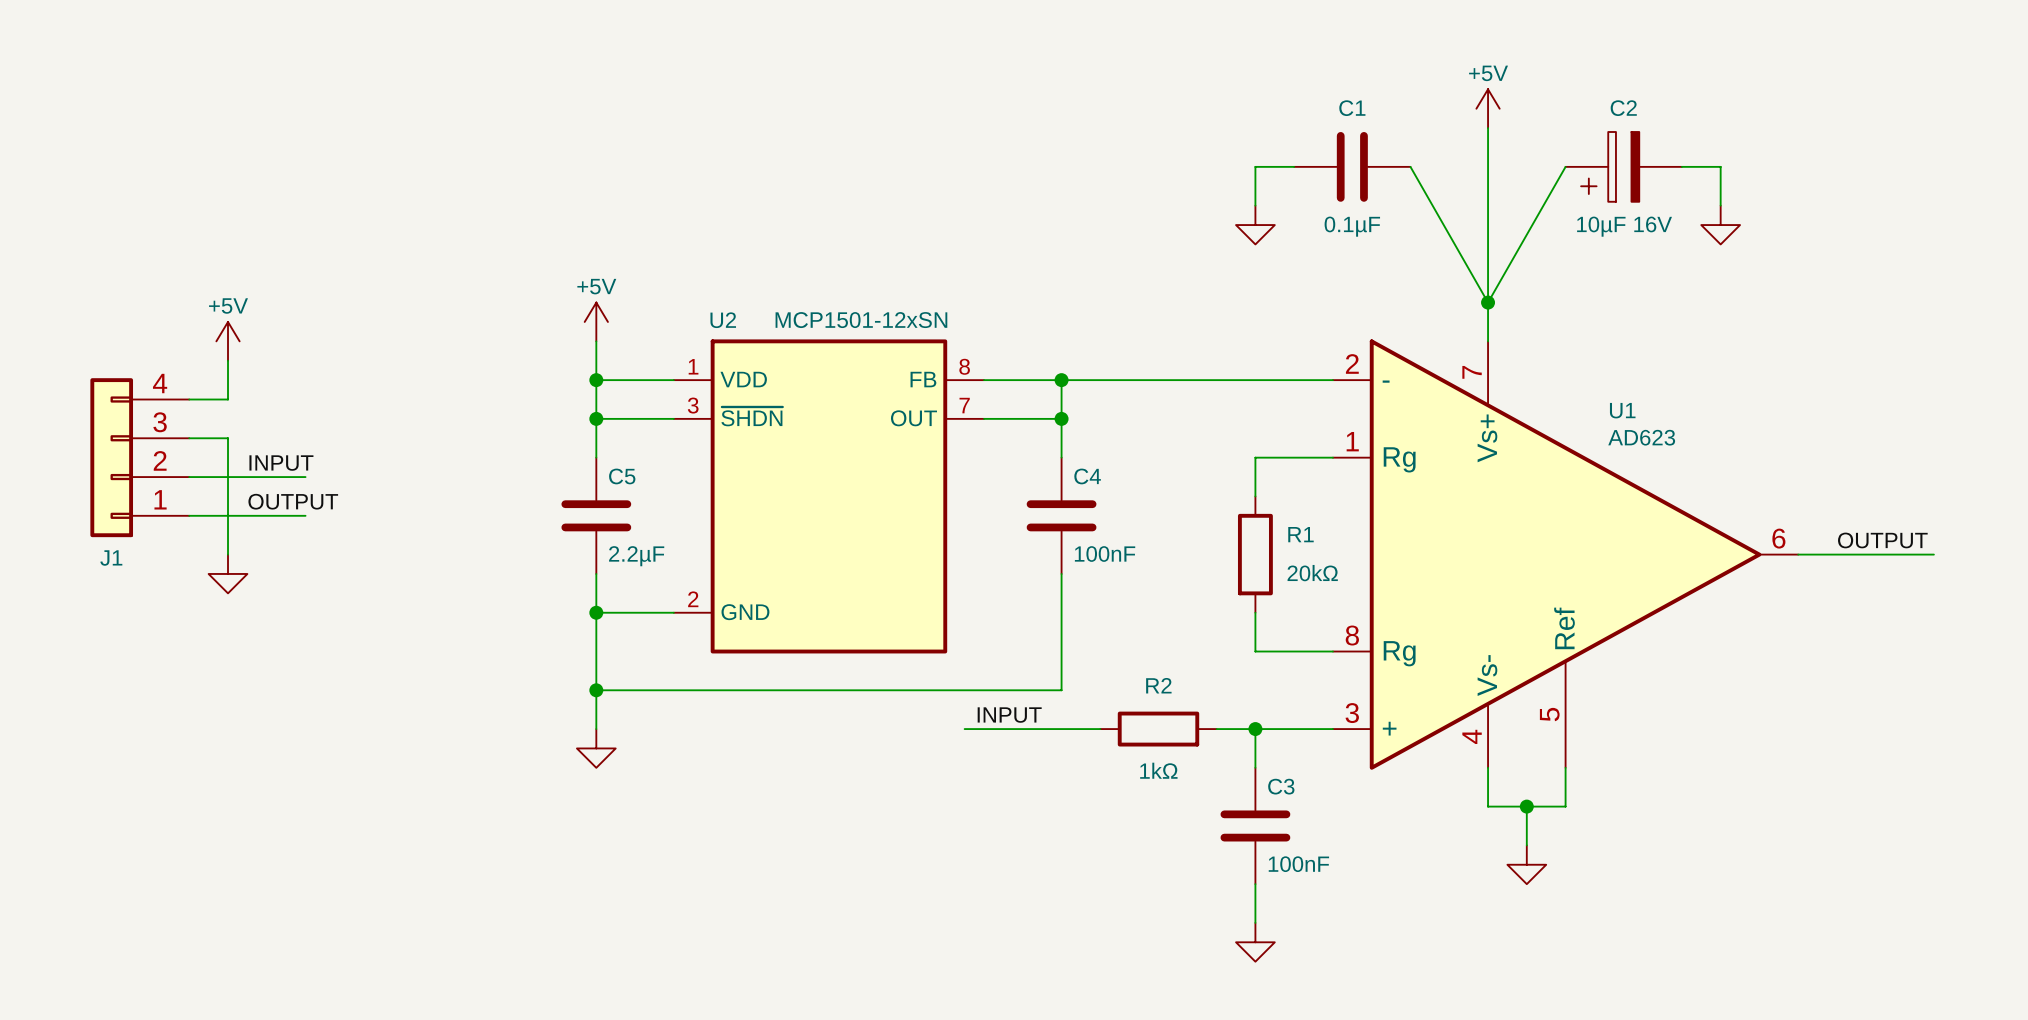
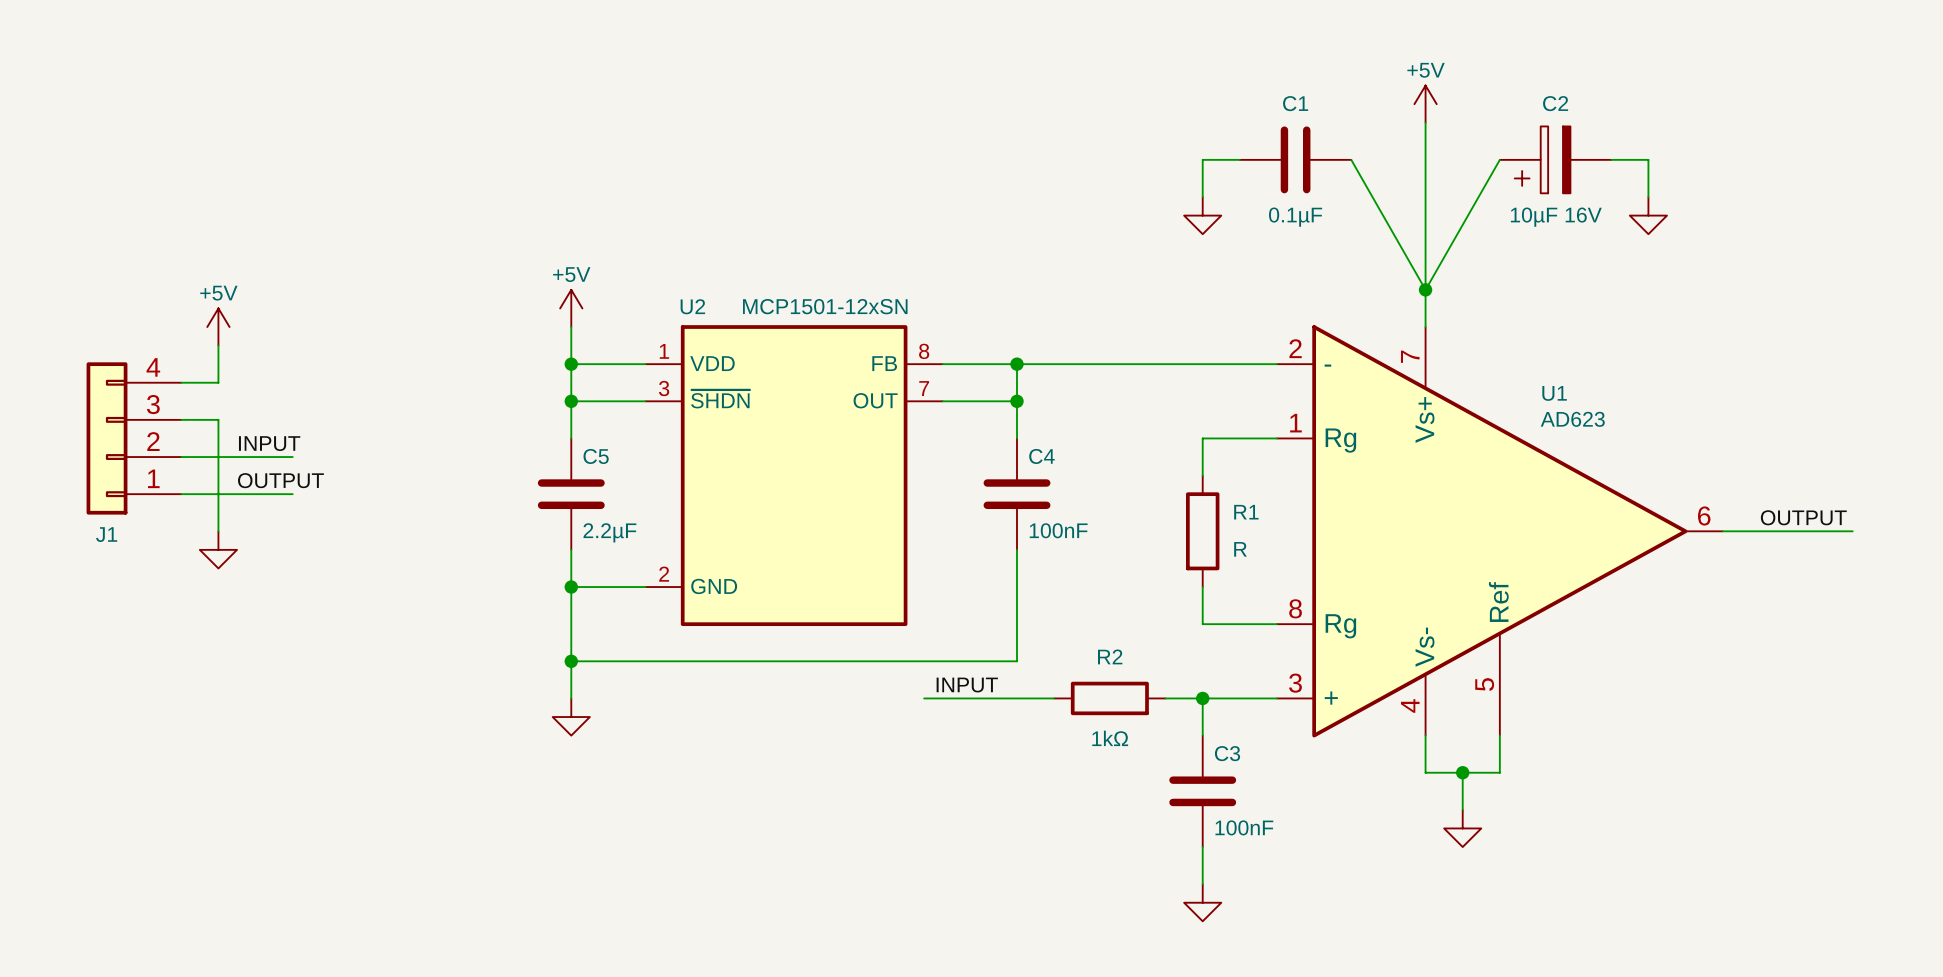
R1 value: 20kΩ (1312, 573) -> R (1240, 549)

